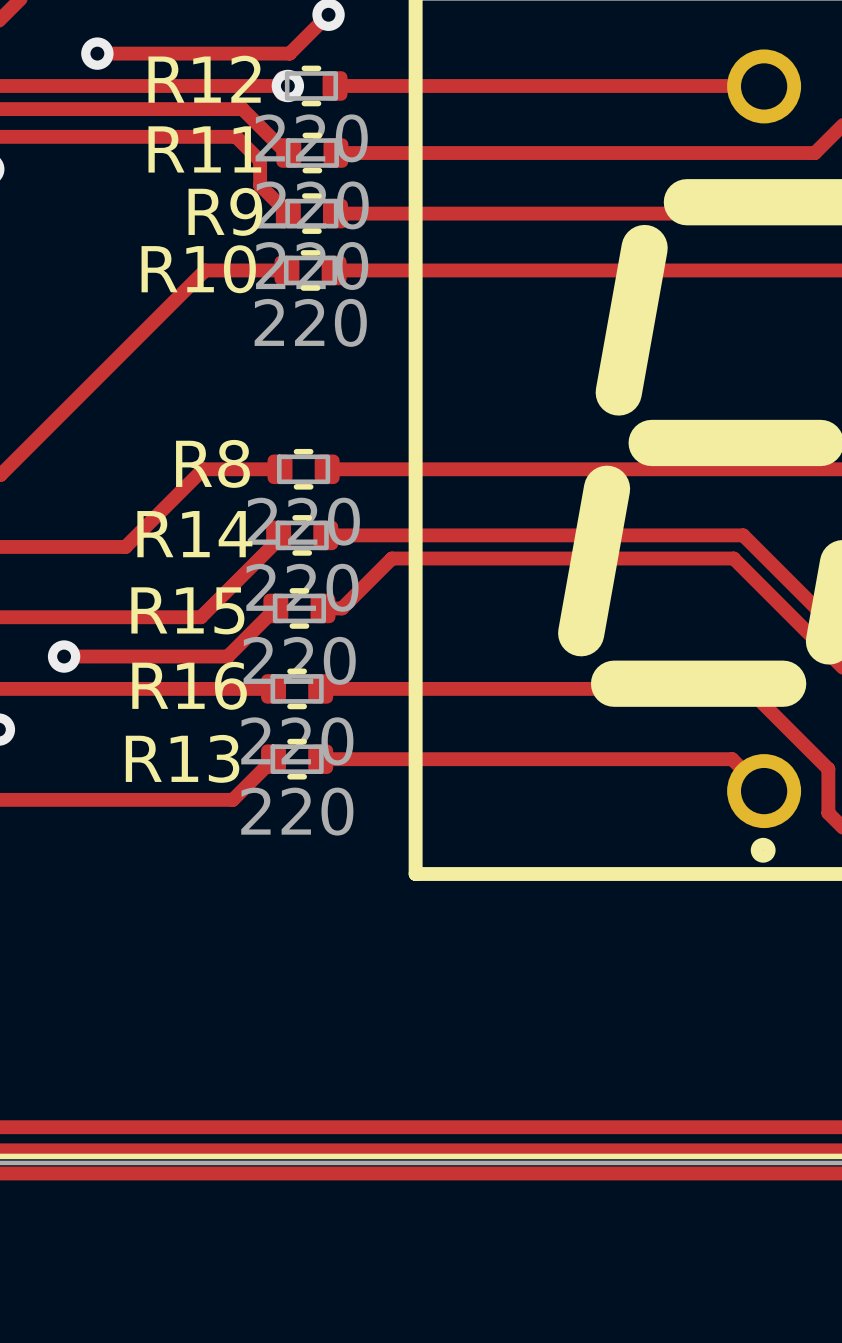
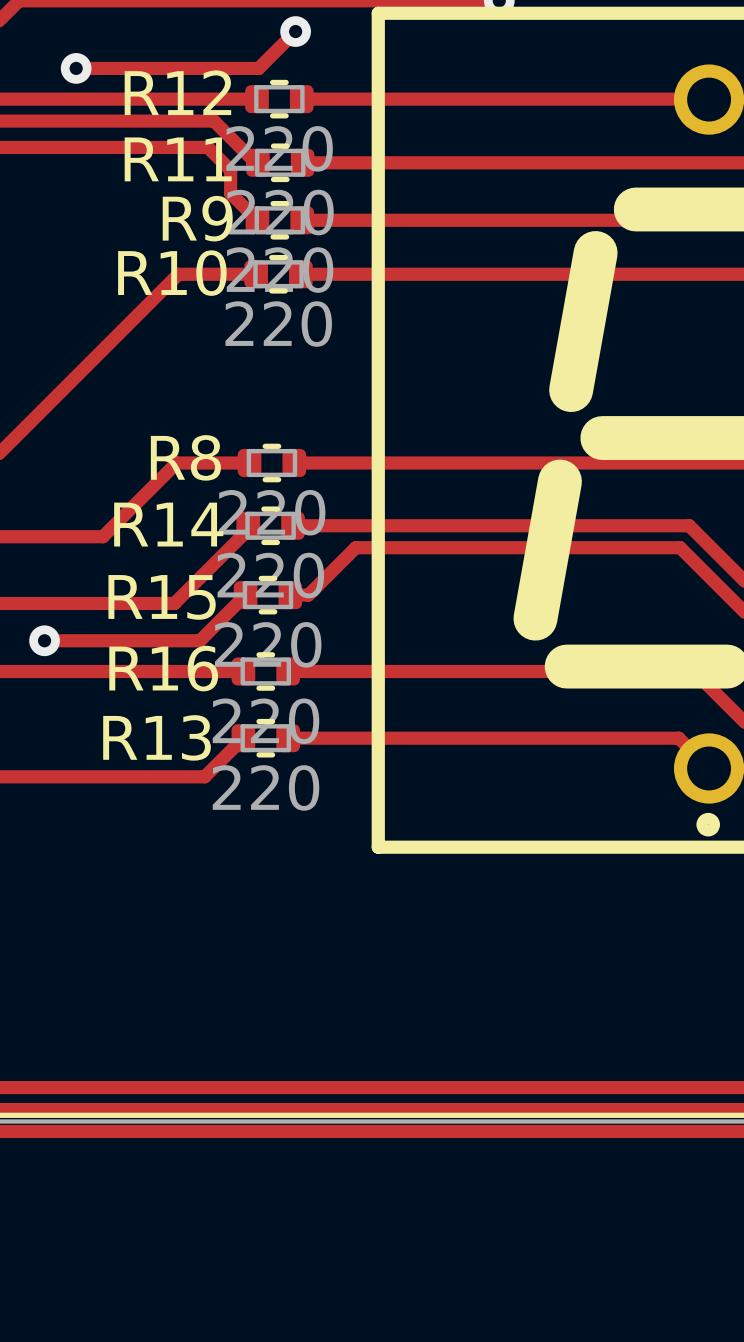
via: (287, 85) -> none

